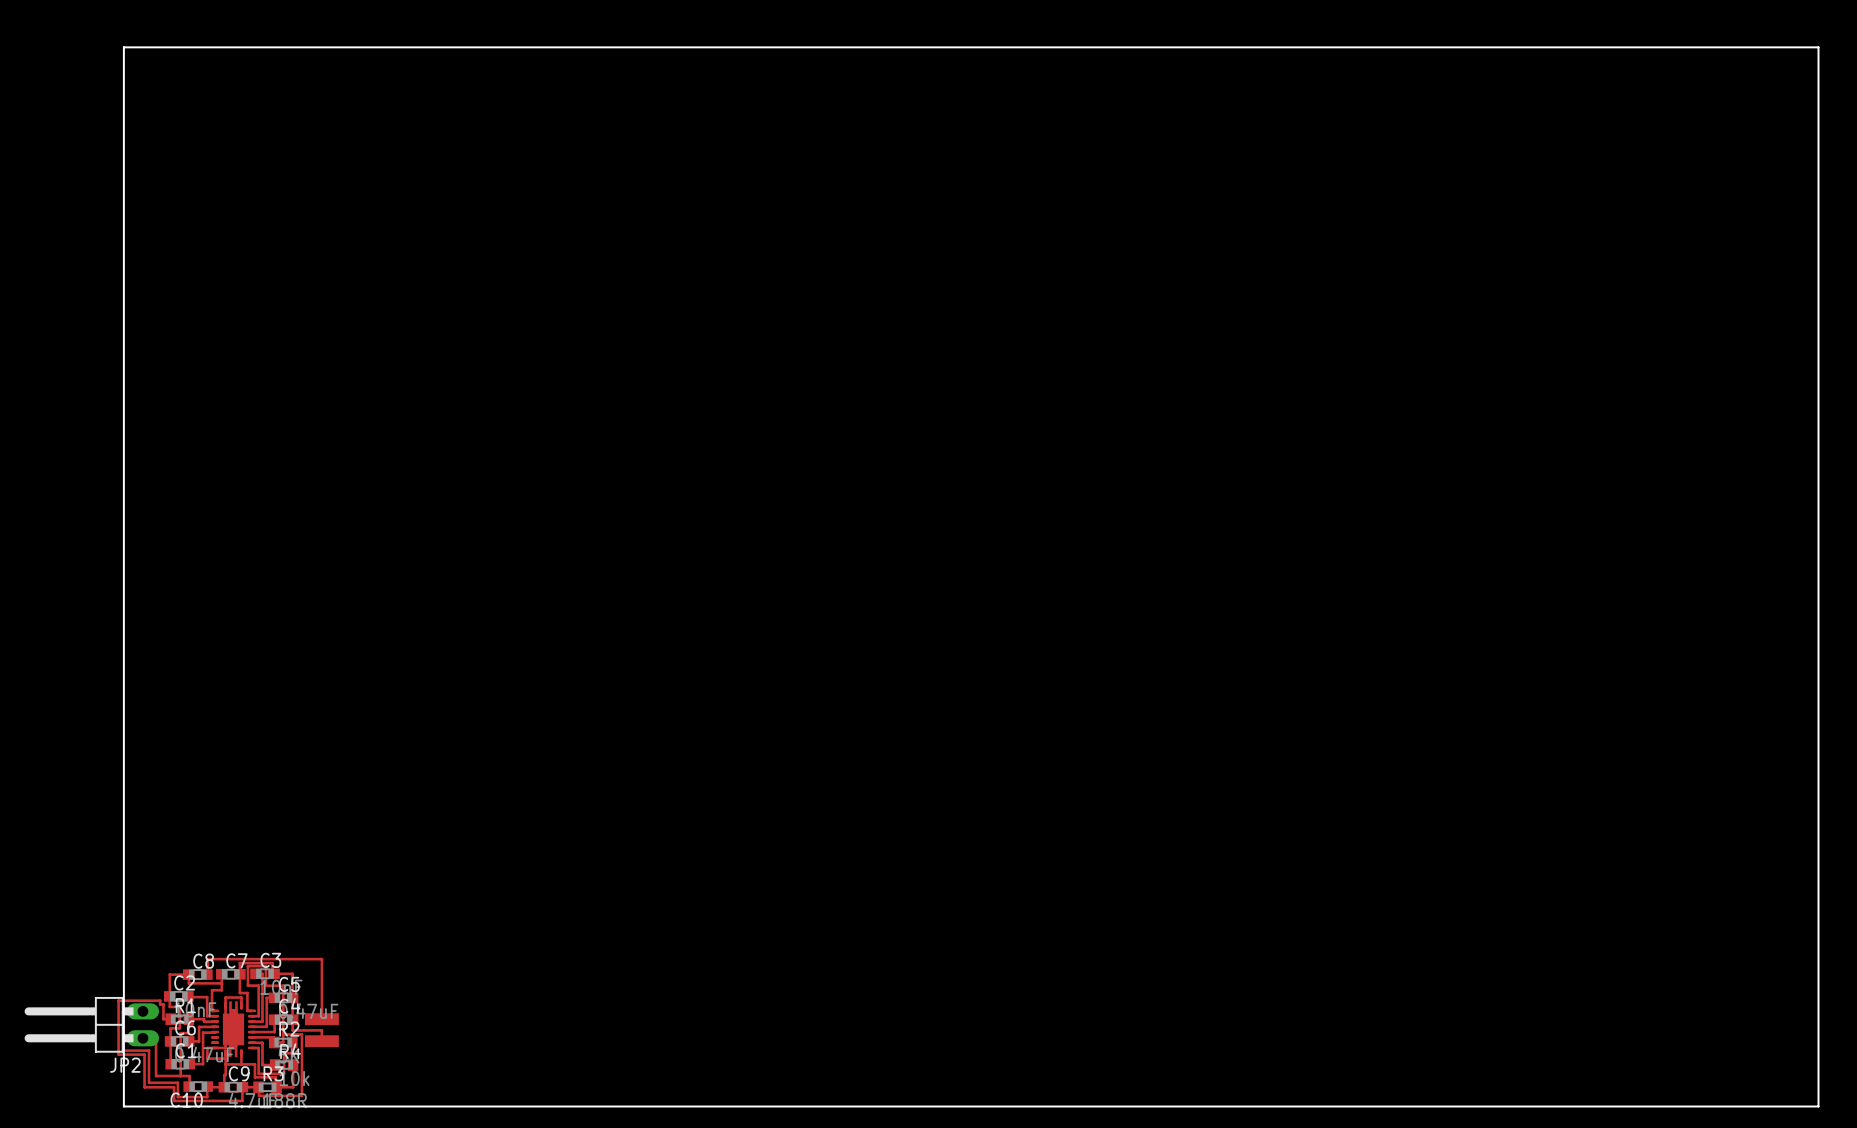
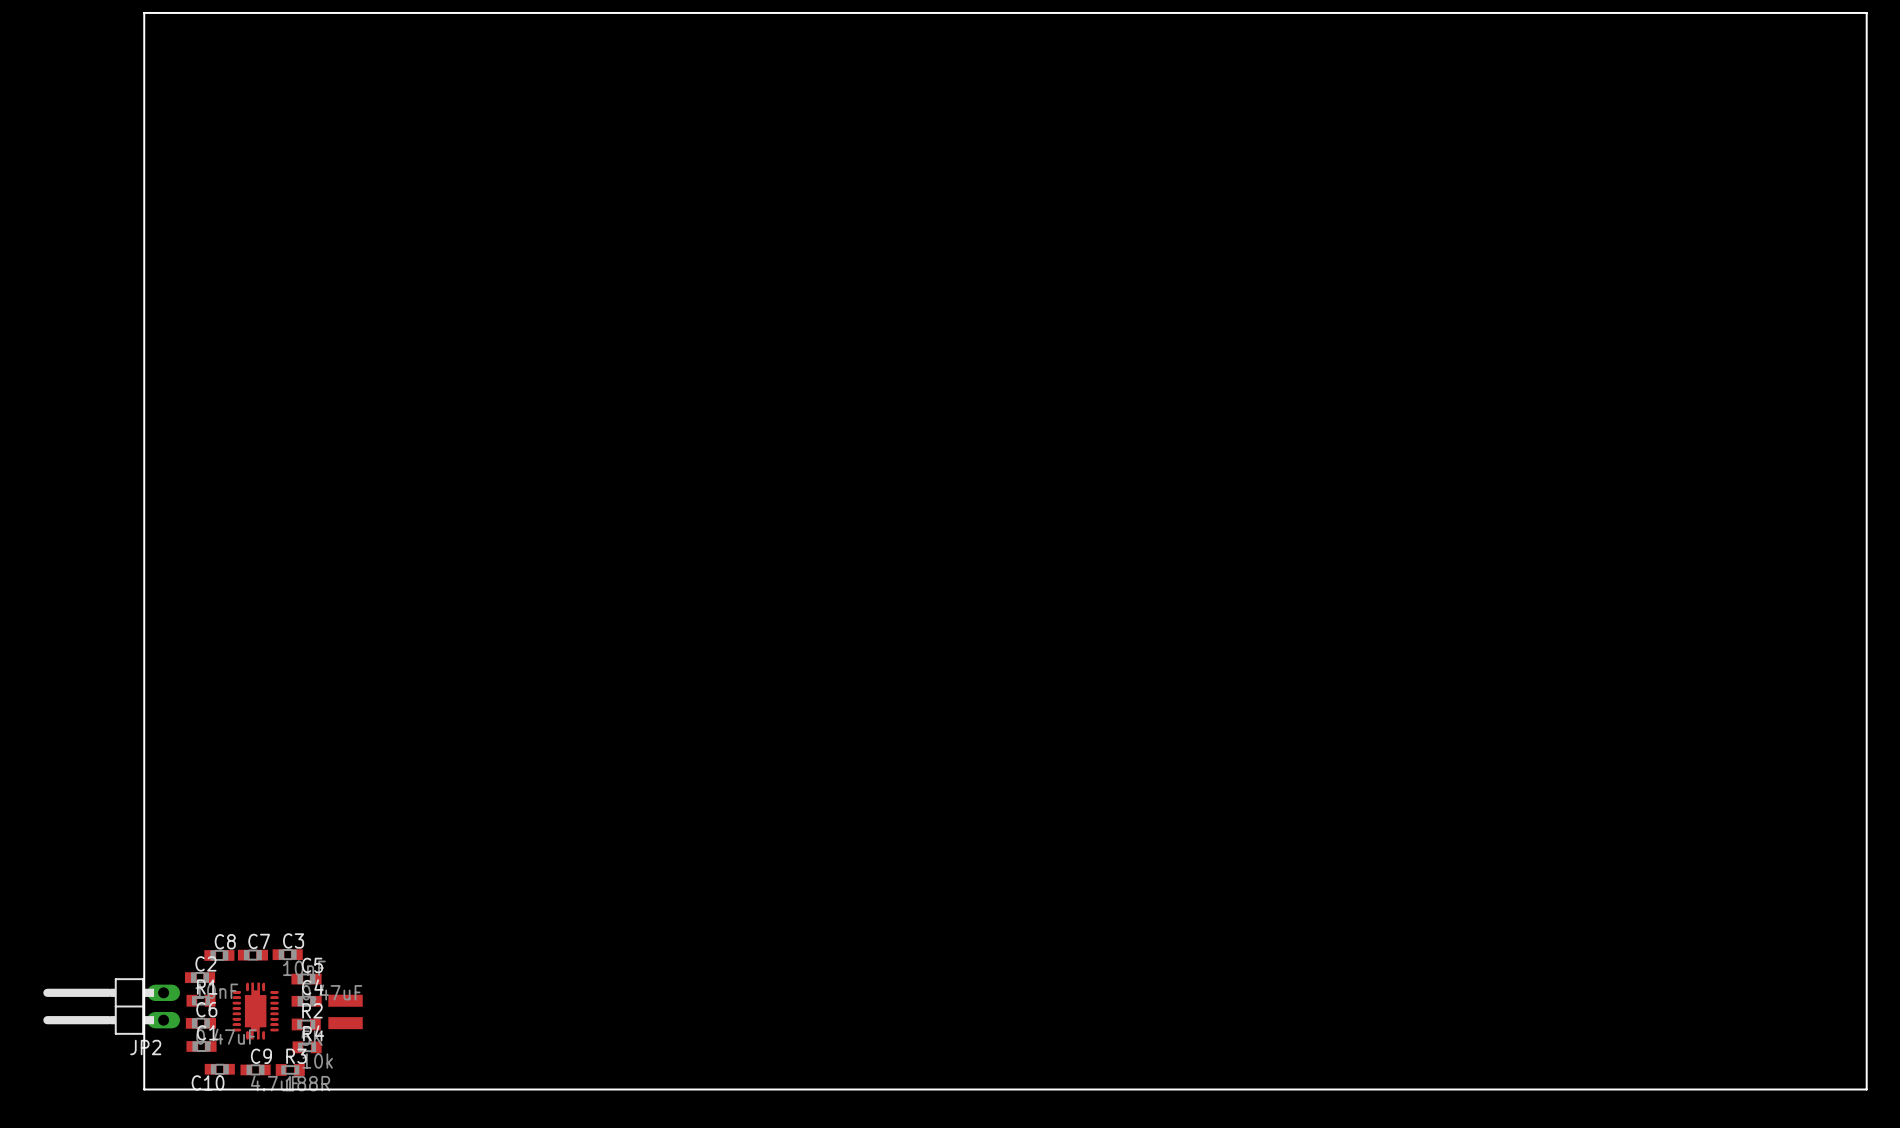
track: (256, 973) (262, 973) (262, 1021) (252, 1021) -> none
track: (206, 974) (207, 959) (321, 959) (321, 1019) -> none
track: (221, 974) (221, 990) (212, 990) (212, 1010) (214, 1010) -> none
track: (221, 983) (188, 983) (188, 974) (169, 974) (169, 1006) (179, 1006) (179, 1028) (170, 1028) (170, 1041) -> none
track: (187, 996) (207, 997) (207, 1016) (214, 1016) -> none
track: (274, 997) (266, 997) (266, 1026) (252, 1026) -> none
track: (241, 1005) (241, 997) (225, 997) (225, 1047) (207, 1047) (207, 1058) (225, 1058) -> none
track: (252, 1010) (247, 1010) (247, 993) (239, 993) (239, 963) (272, 963) (272, 973) (292, 973) (292, 1019) -> none
track: (142, 1011) (123, 1011) (123, 1050) (149, 1050) (149, 1082) (177, 1082) (177, 1097) (207, 1097) (207, 1086) -> none
track: (252, 1016) (258, 1016) (258, 985) (247, 985) (247, 966) (265, 966) (265, 985) (283, 985) (283, 1042) (274, 1042) (274, 1037) (252, 1037) -> none
track: (170, 1019) (163, 1019) (163, 1004) (160, 1004) (160, 1000) (118, 1000) (118, 1054) (144, 1054) (144, 1087) (174, 1087) (174, 1100) (242, 1100) (242, 1087) (259, 1087) (259, 1095) (301, 1095) (301, 1034) (283, 1034) -> none
track: (274, 1019) (274, 1032) (252, 1032) -> none
track: (292, 1019) (292, 1030) (321, 1030) (321, 1041) -> none
track: (214, 1021) (188, 1019) (188, 1033) (180, 1033) (180, 1076) -> none
track: (214, 1026) (199, 1026) (199, 1041) (188, 1041) -> none
track: (214, 1032) (203, 1032) (203, 1064) (189, 1064) -> none
track: (142, 1038) (156, 1038) (156, 1076) (189, 1076) (189, 1086) -> none
track: (170, 1041) (171, 1064) -> none
track: (252, 1042) (262, 1042) (262, 1065) (275, 1065) -> none
track: (292, 1042) (292, 1053) (284, 1053) (284, 1073) (258, 1073) (258, 1047) (252, 1047) -> none
track: (225, 1053) (224, 1087) (207, 1087) -> none
track: (241, 1053) (241, 1064) -> none
track: (225, 1064) (254, 1064) (254, 1077) (275, 1077) (275, 1087) (293, 1087) (293, 1065) -> none

